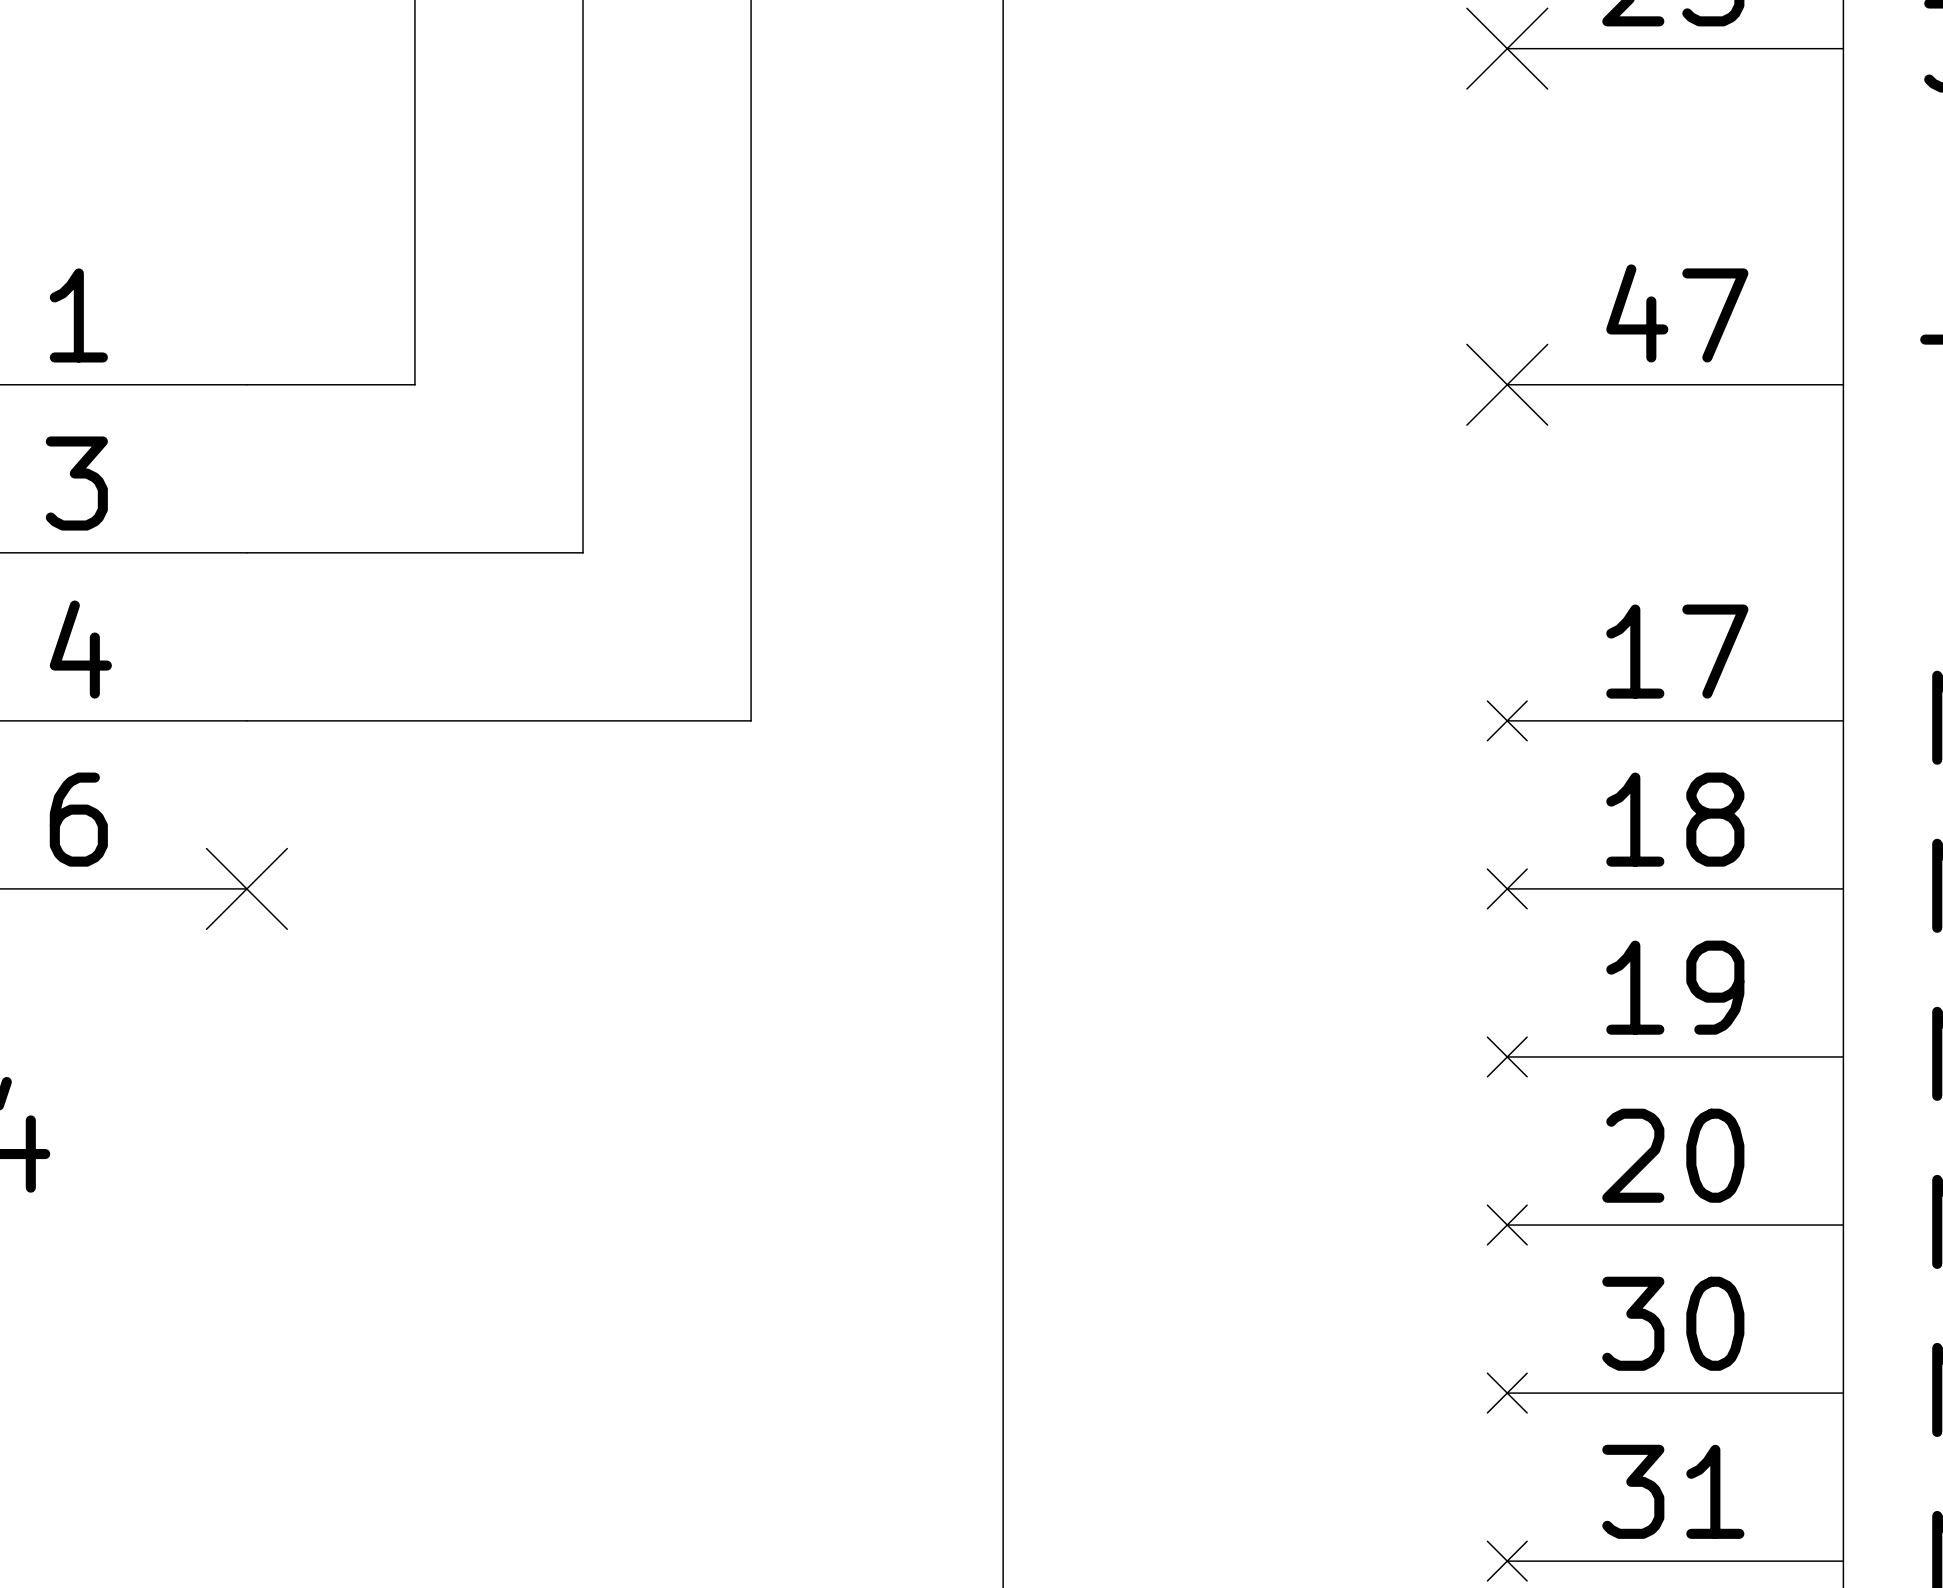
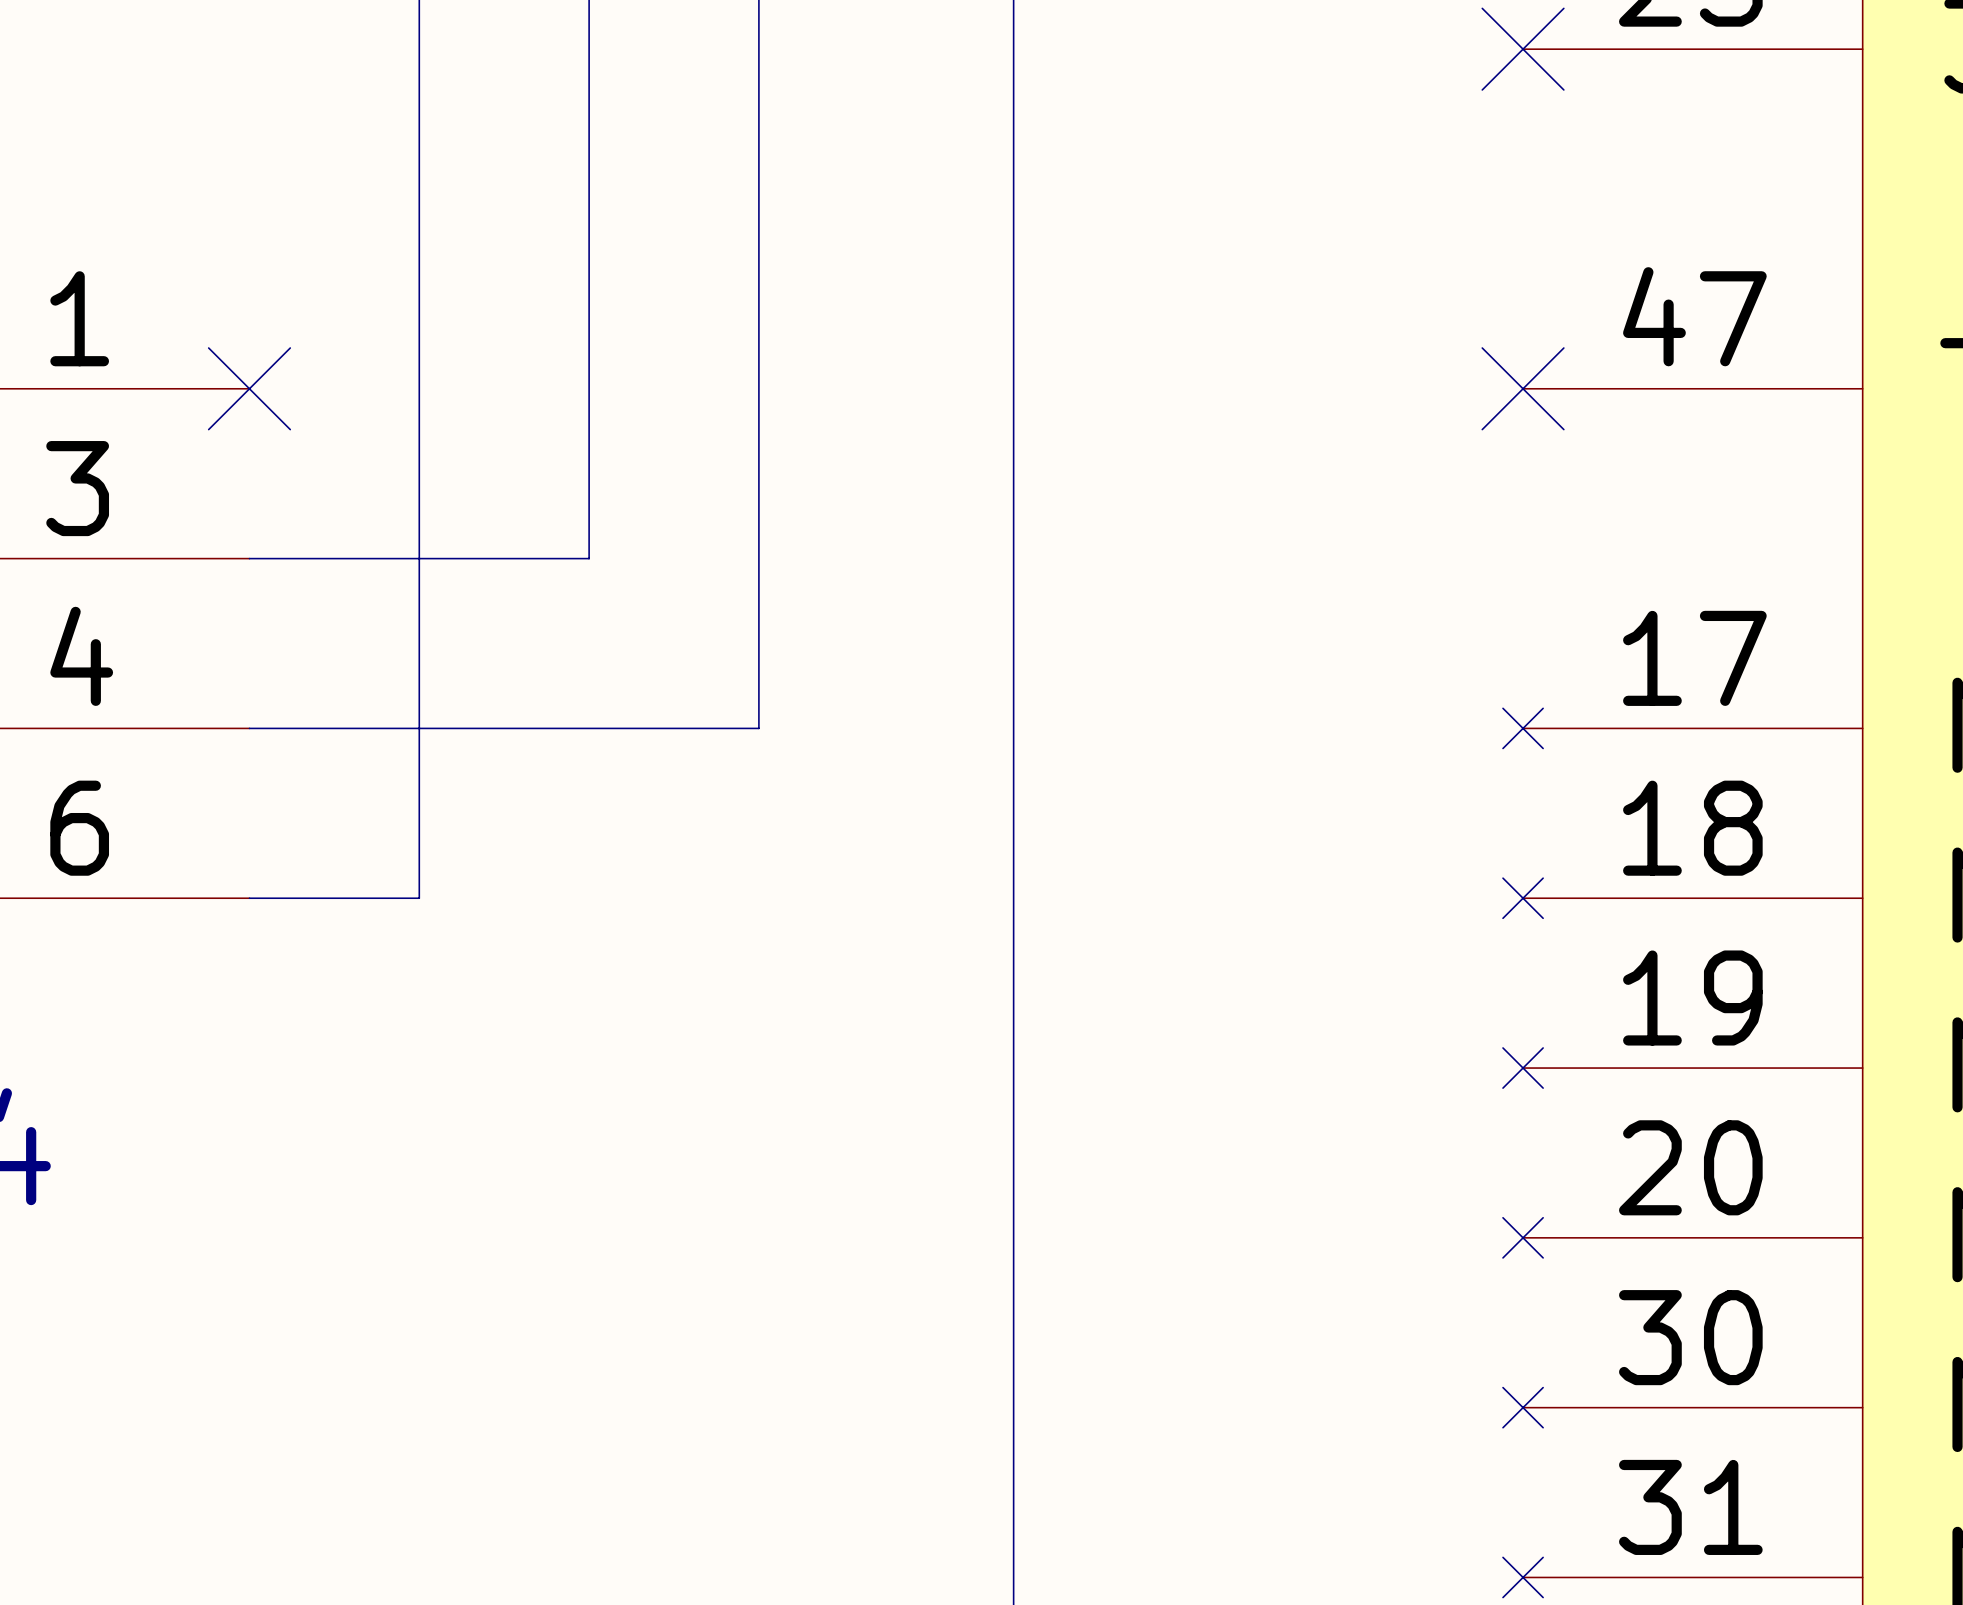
wire: (246, 384) (414, 384) -> (249, 898) (419, 898) (419, 388)
no-connect mark: none -> (249, 388)
no-connect mark: (246, 888) -> none

